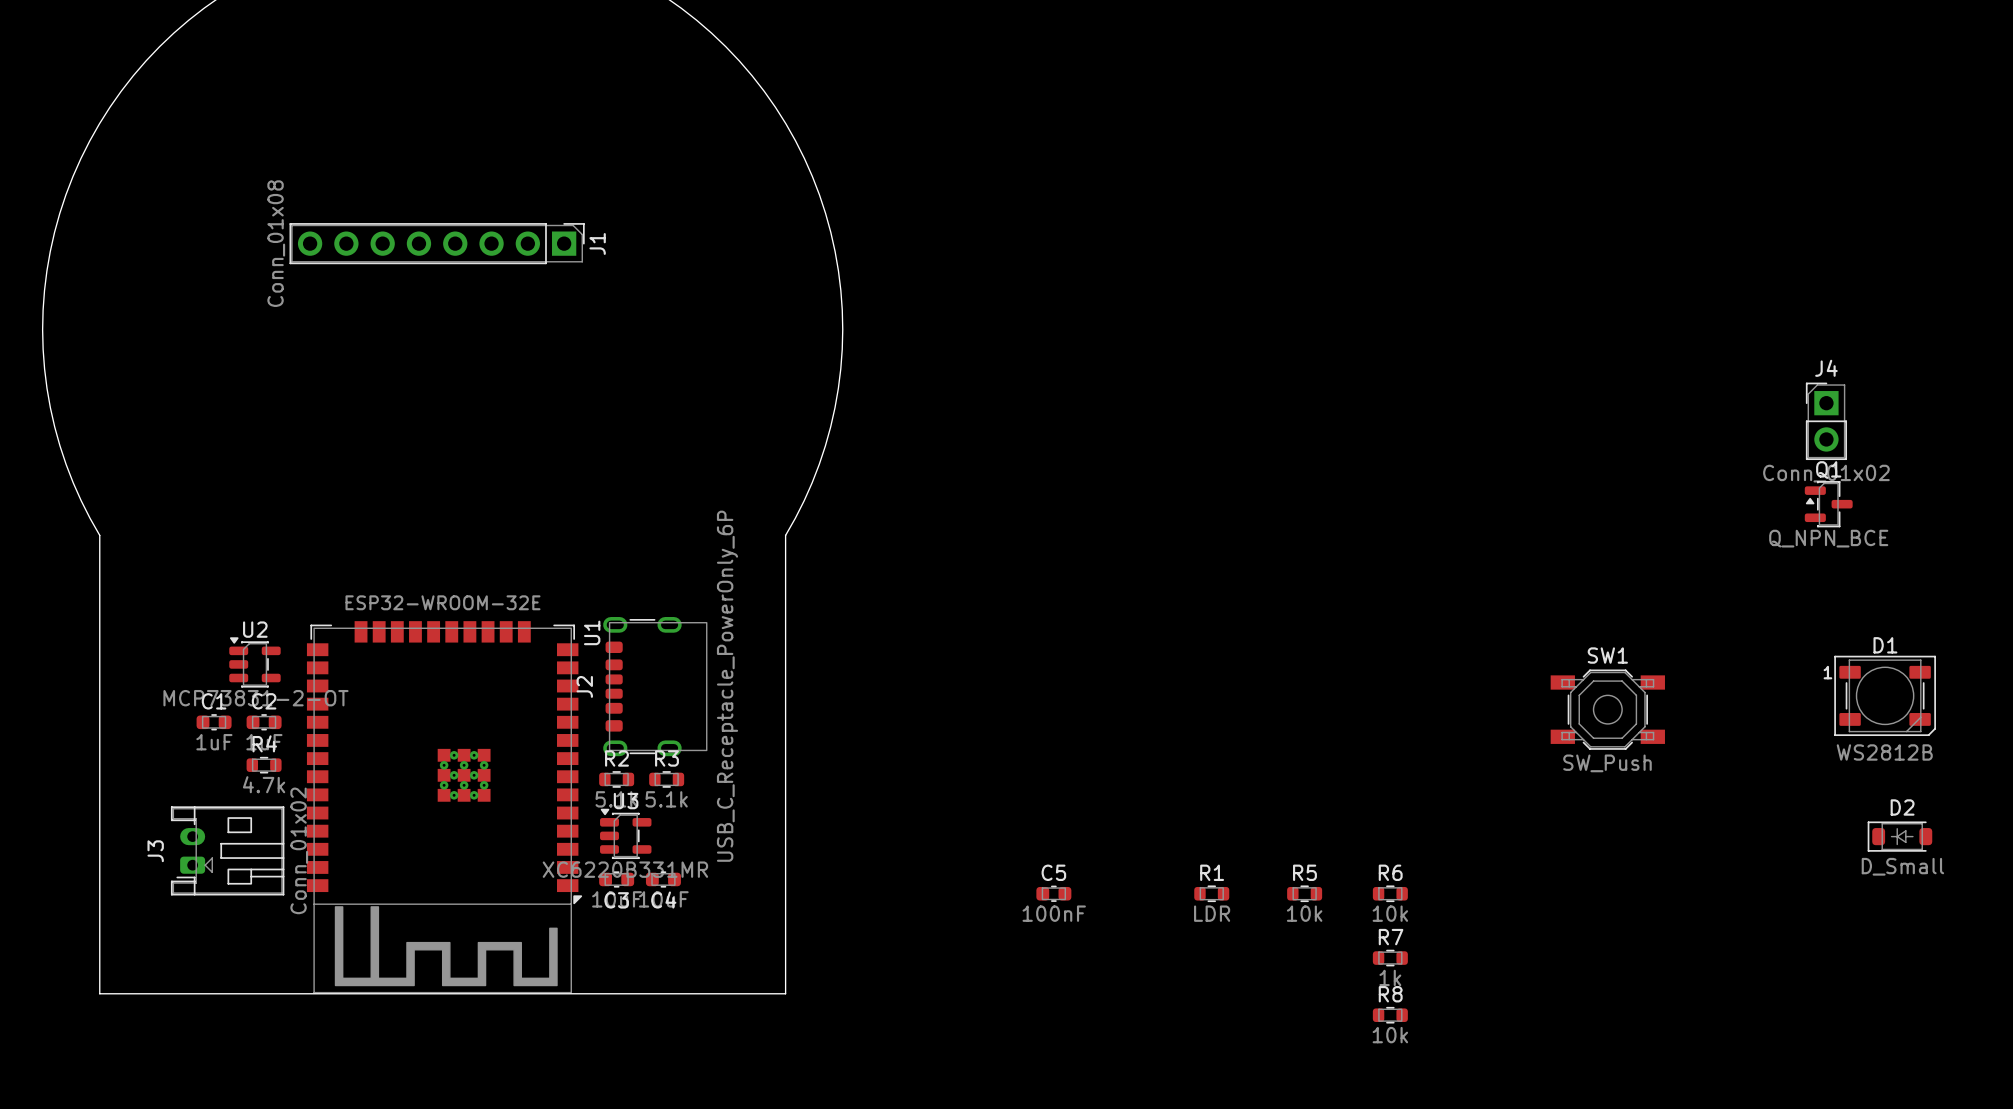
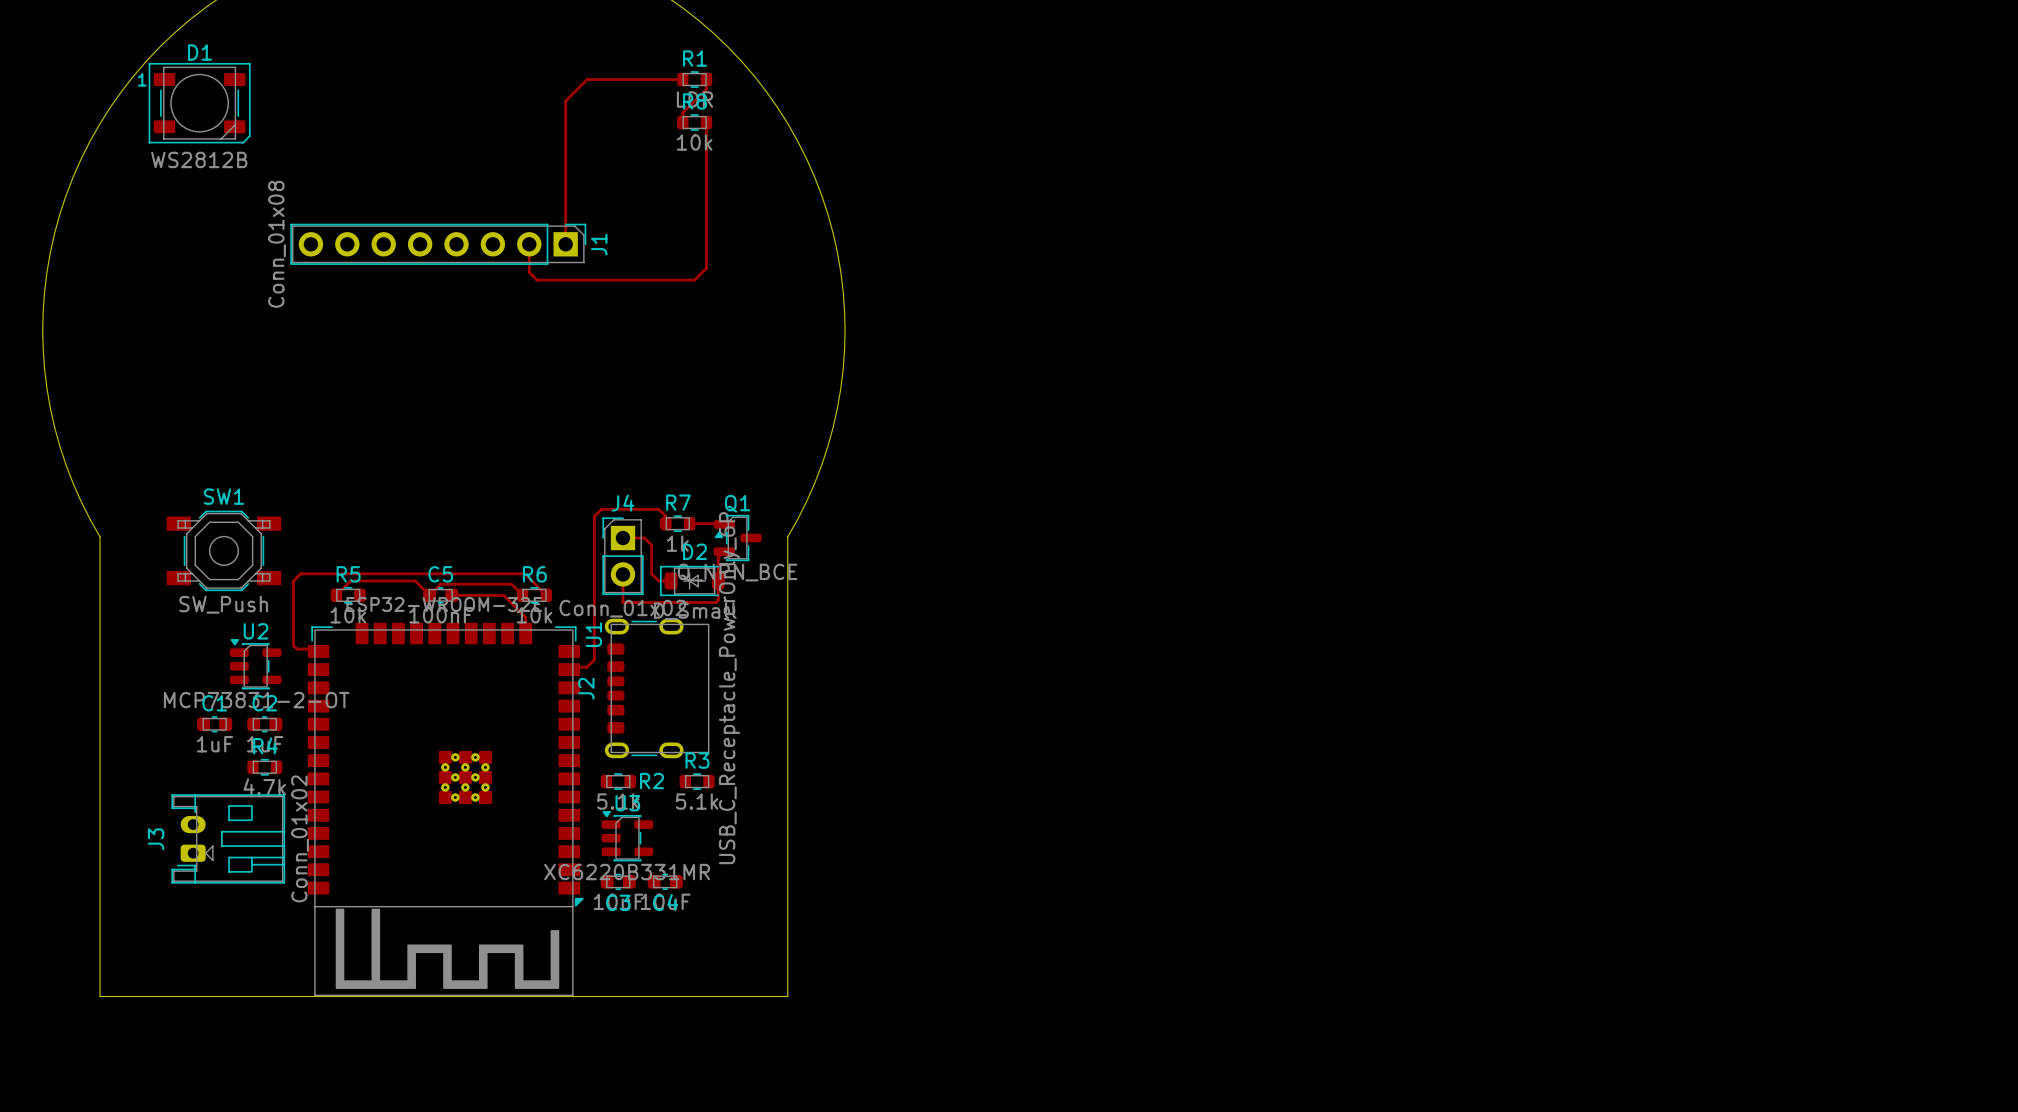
top track: none -> (682, 79) (587, 79) (565, 101) (565, 244)
top track: none -> (706, 79) (706, 89) (682, 112) (682, 122)
top track: none -> (708, 122) (706, 122) (706, 268) (694, 280) (537, 280) (529, 272) (529, 244)
J4 position: (1826, 421) -> (622, 556)
Q1 position: (1828, 504) -> (737, 538)
top track: none -> (665, 523) (665, 516) (658, 509) (601, 509) (594, 516) (594, 659) (586, 667) (569, 667)
top track: none -> (689, 523) (724, 524)
top track: none -> (622, 538) (644, 538) (651, 545) (651, 573) (658, 581) (670, 581)
top track: none -> (724, 551) (718, 557) (718, 600) (716, 602) (622, 602) (622, 574)
top track: none -> (336, 595) (350, 581) (415, 581) (429, 595) (440, 584) (511, 584) (522, 595)
top track: none -> (451, 595) (503, 595) (525, 617) (525, 631)
top track: none -> (546, 595) (524, 573) (300, 573) (293, 581) (293, 645) (297, 649) (318, 649)
D1 position: (1885, 695) -> (199, 103)
SW1 position: (1607, 709) -> (223, 550)
R2 name position: R2 (616, 758) -> R2 (651, 781)
R3 position: (666, 779) -> (697, 781)
D2 position: (1899, 836) -> (692, 581)
J3 position: (227, 850) -> (228, 838)
C5 position: (1053, 893) -> (440, 595)
R1 position: (1211, 893) -> (694, 79)
R5 position: (1304, 893) -> (348, 595)
R6 position: (1390, 893) -> (534, 595)
R7 position: (1390, 958) -> (677, 523)
R8 position: (1390, 1015) -> (694, 122)

